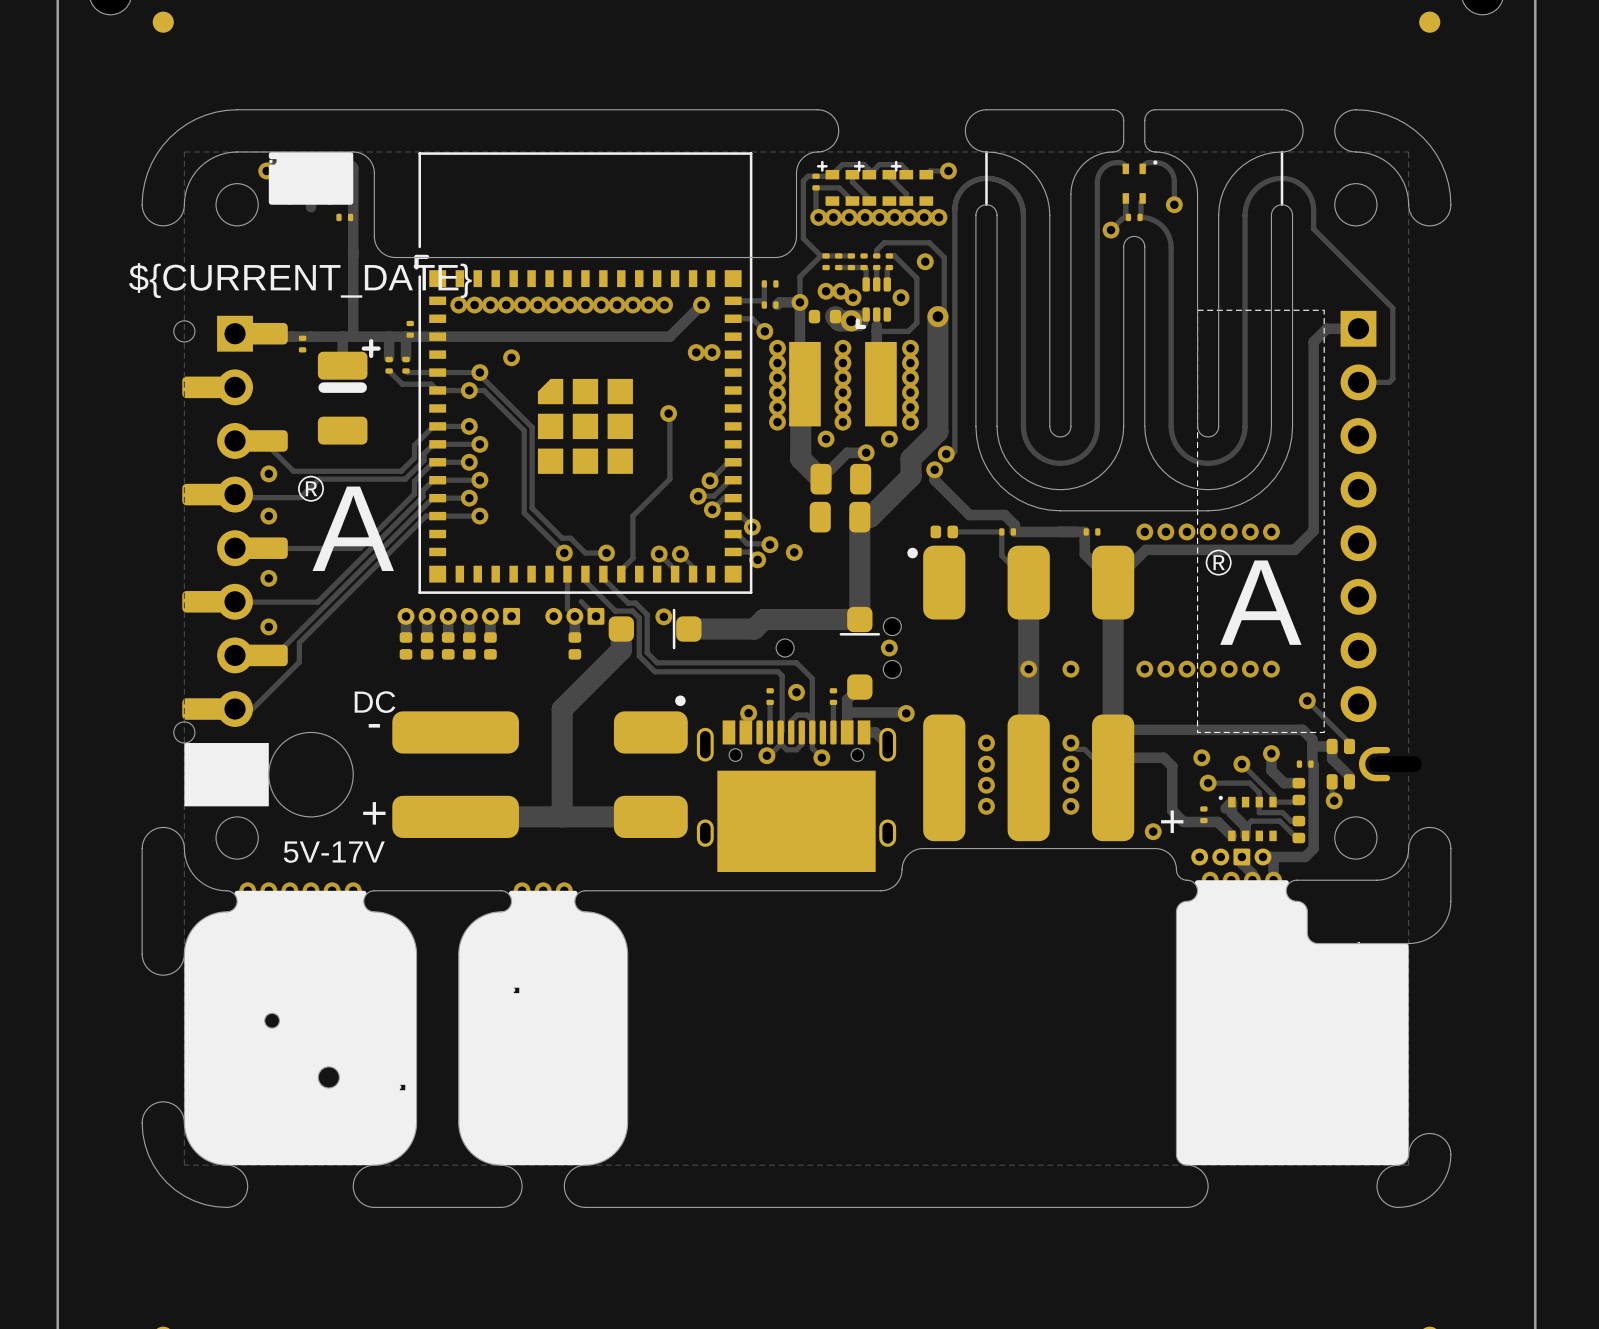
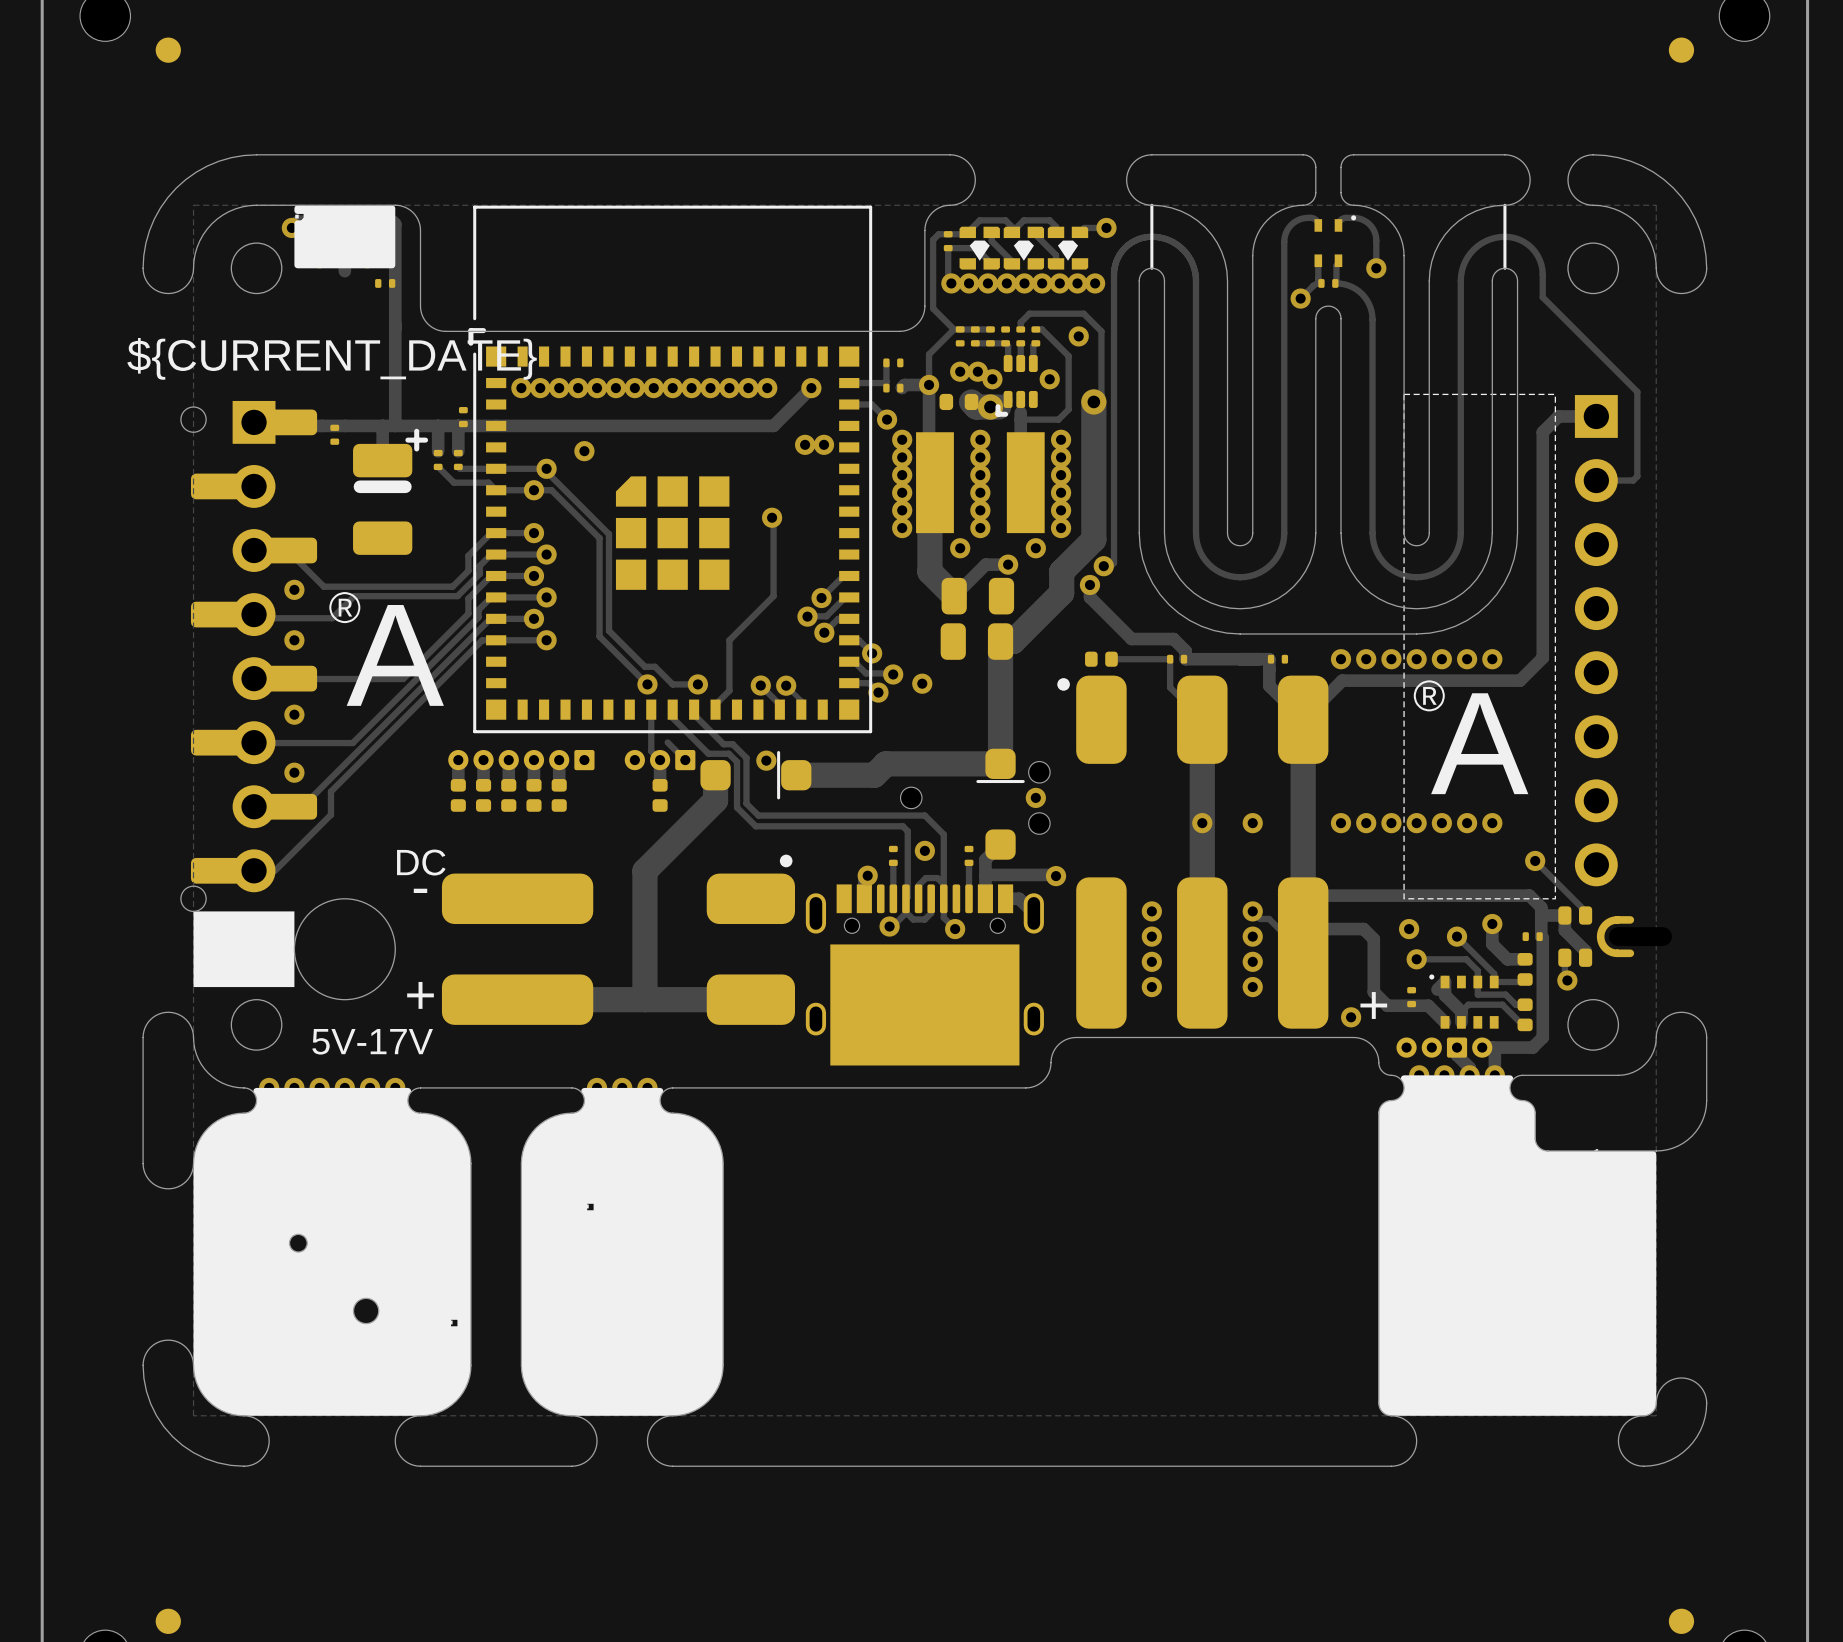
part footprint: [816, 160, 860, 206] -> [959, 226, 1000, 270]
part footprint: [853, 160, 897, 206] -> [1003, 226, 1045, 270]
part footprint: [890, 160, 934, 206] -> [1047, 226, 1089, 270]

